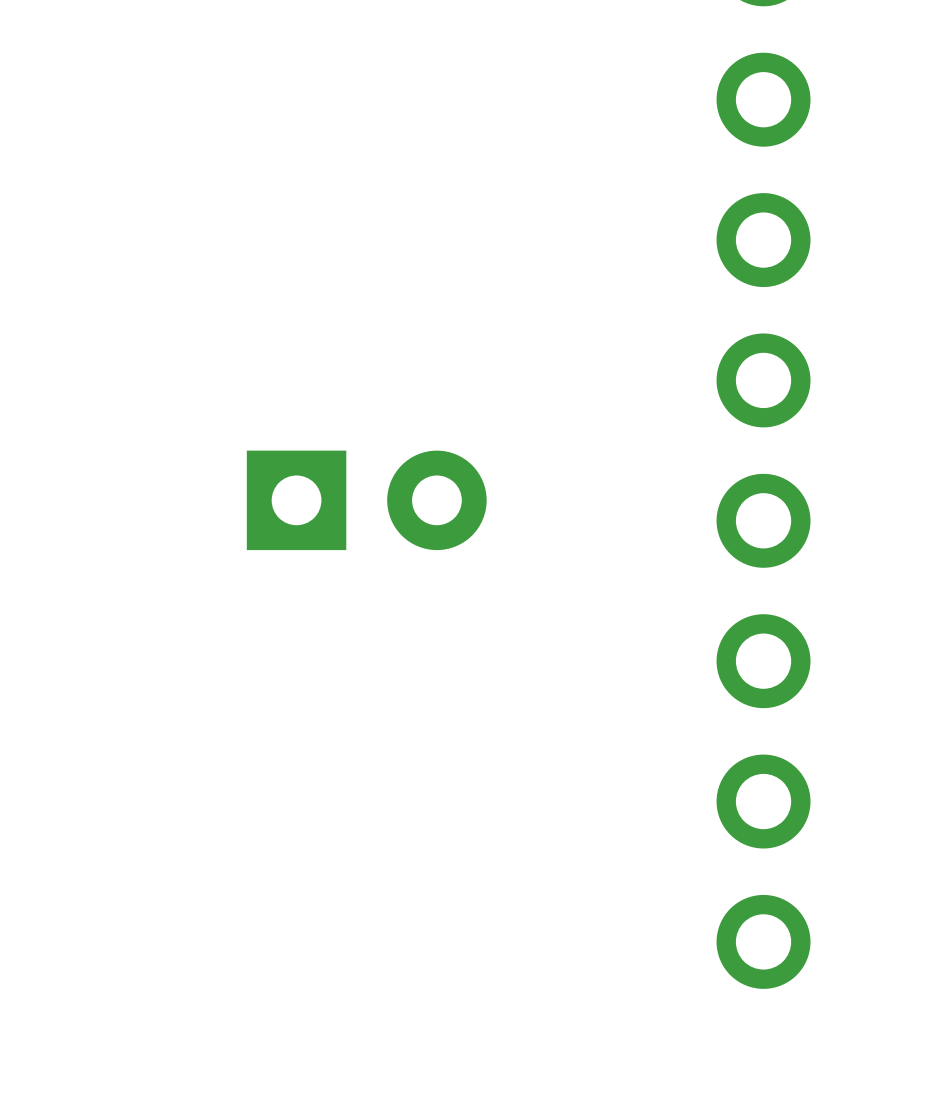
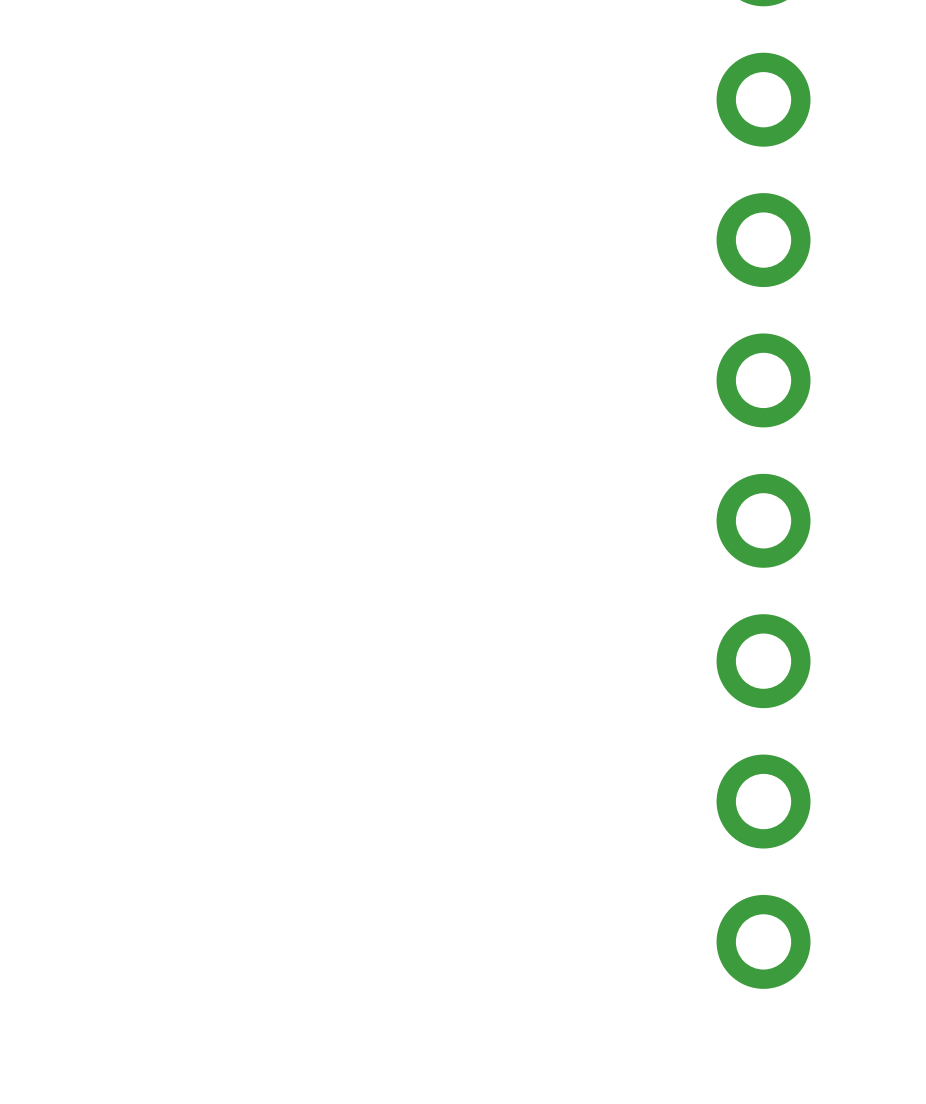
part: (366, 500) -> none

